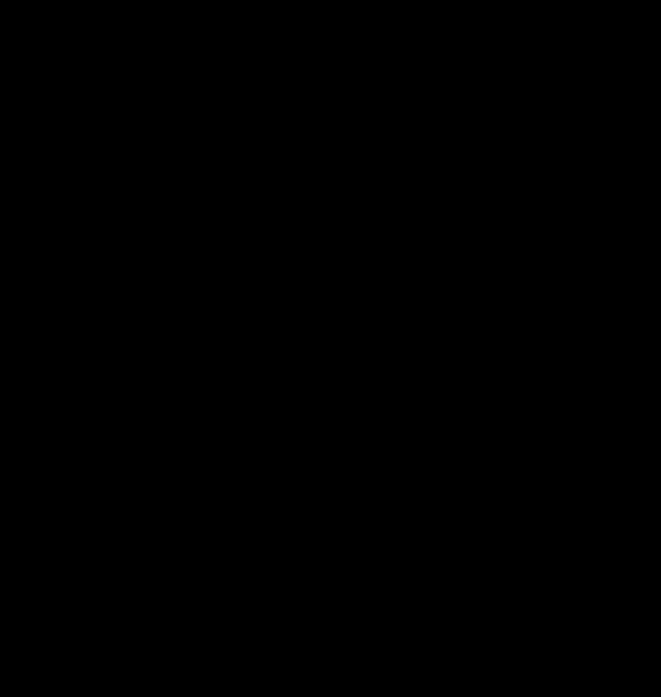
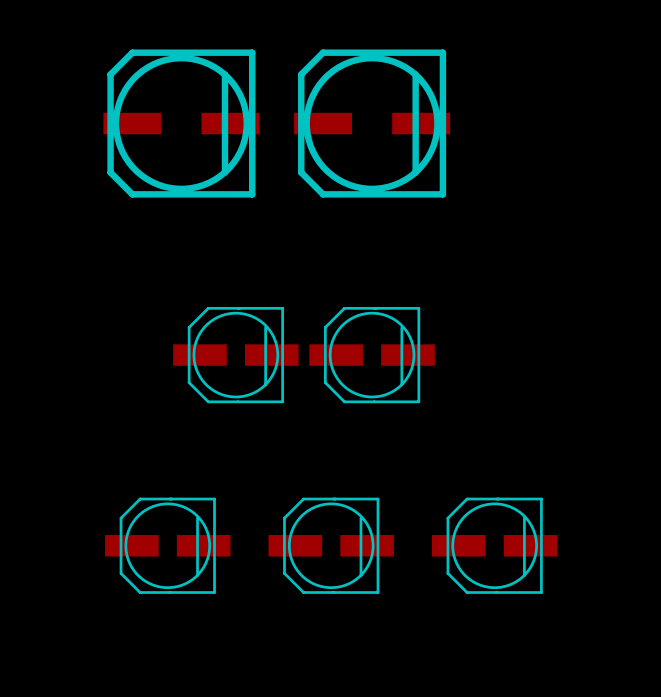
part: none -> (181, 123)
part: none -> (372, 123)
part: none -> (235, 355)
part: none -> (372, 355)
part: none -> (167, 545)
part: none -> (331, 545)
part: none -> (494, 545)

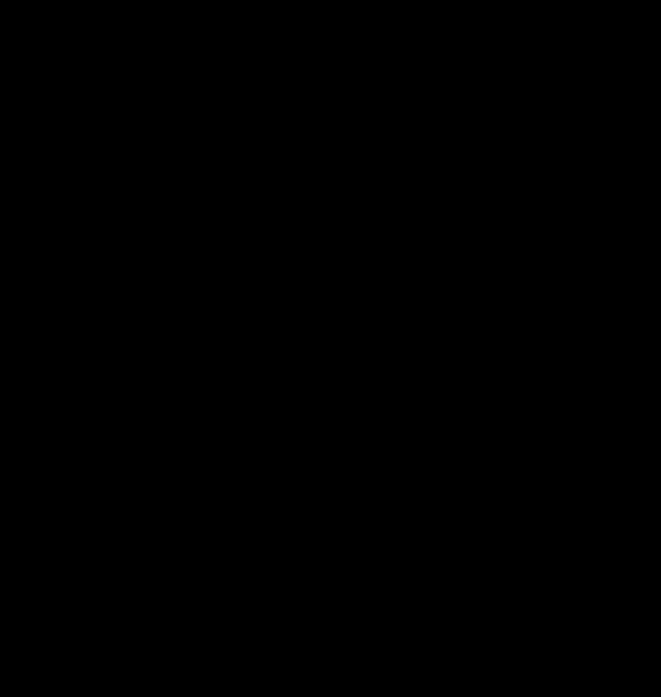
part: (181, 123) -> none
part: (372, 123) -> none
part: (235, 355) -> none
part: (372, 355) -> none
part: (167, 545) -> none
part: (331, 545) -> none
part: (494, 545) -> none

